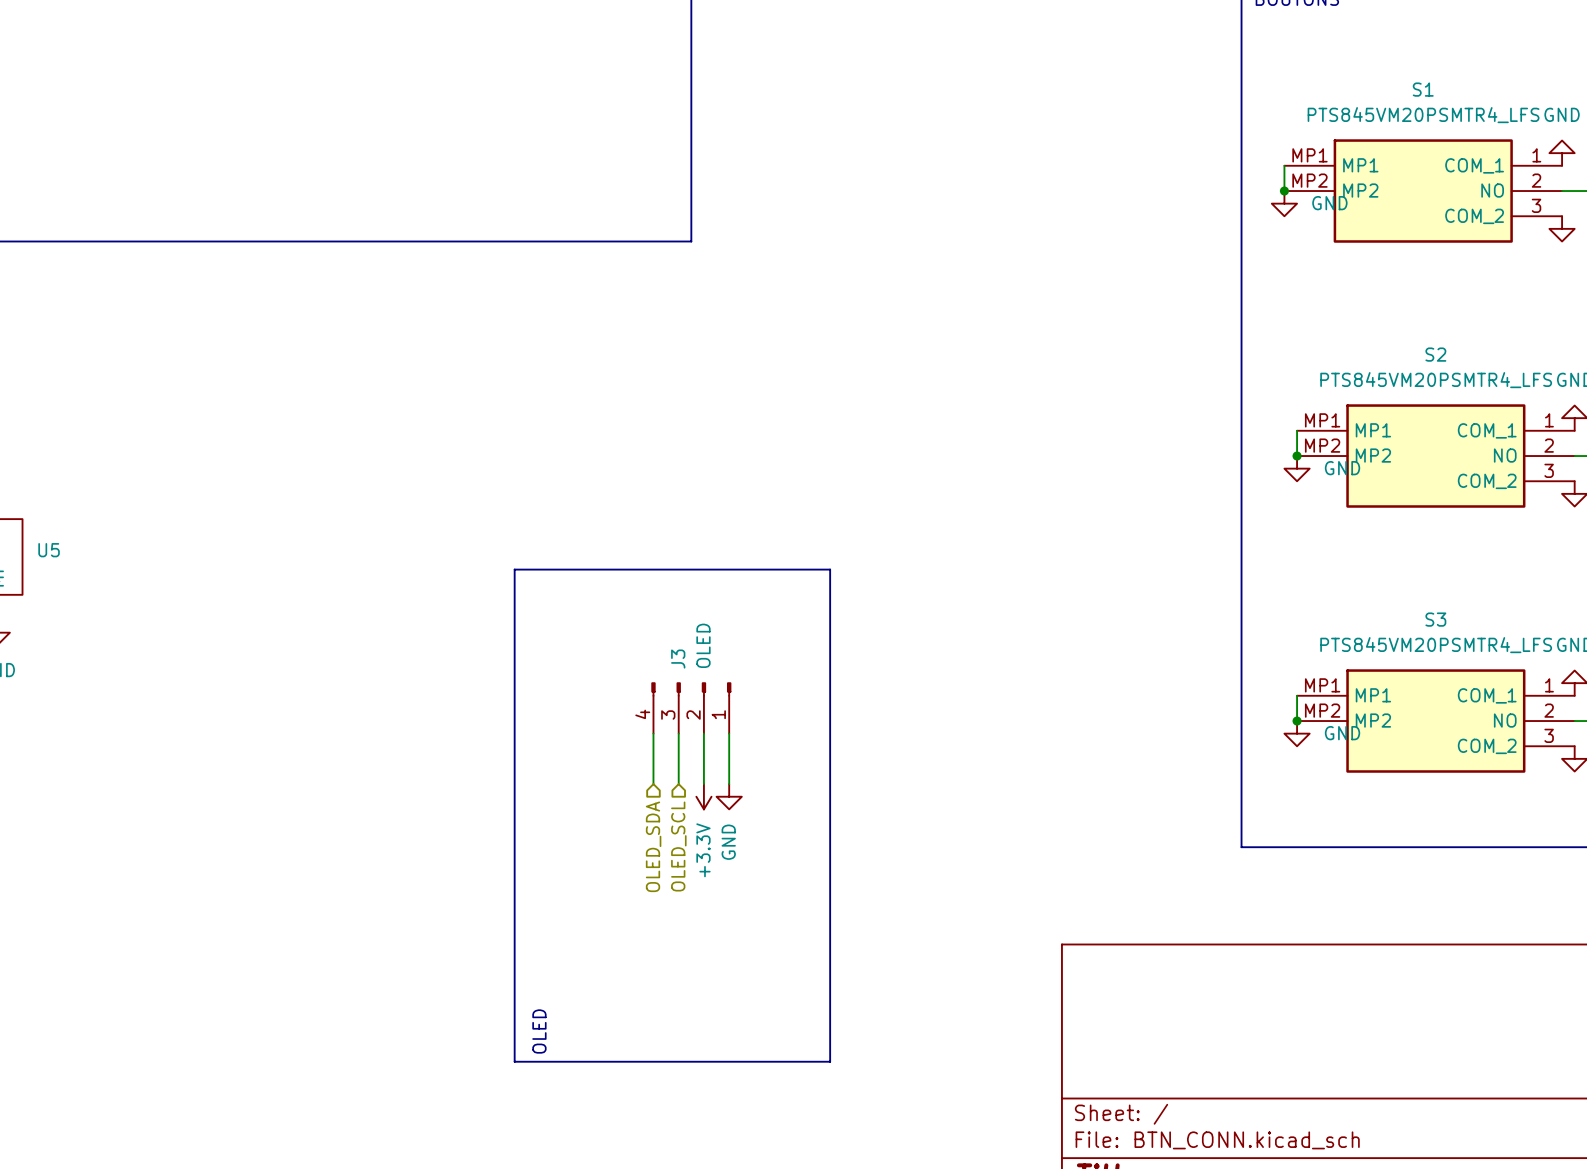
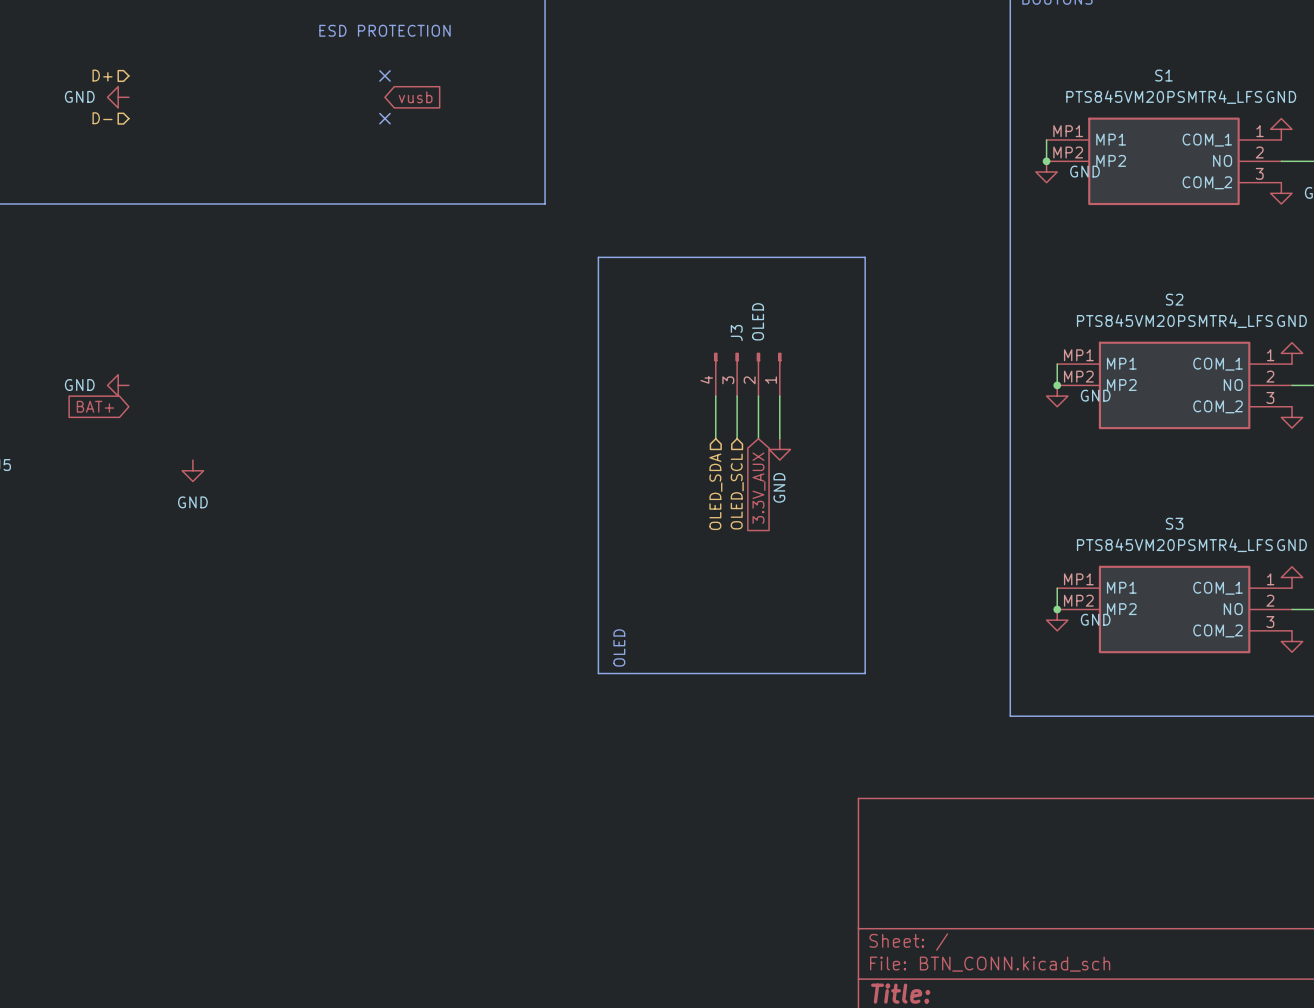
text: none -> ESD PROTECTION (384, 30)
hierarchical label: none -> D+ (102, 75)
no-connect mark: none -> (384, 75)
power symbol: none -> GND (118, 97)
global label: none -> vusb (415, 97)
hierarchical label: none -> D- (102, 118)
no-connect mark: none -> (384, 118)
line: none -> (598, 257) (865, 257) (865, 673) (598, 673) (598, 257)
power symbol: none -> GND (118, 385)
wire: none -> (715, 396) (715, 438)
wire: none -> (737, 396) (737, 438)
wire: none -> (758, 396) (758, 438)
wire: none -> (779, 396) (779, 438)
global label: none -> BAT+ (95, 406)
power symbol: none -> GND (779, 449)
power symbol: none -> GND (192, 470)
line: (514, 569) (830, 569) (830, 1061) (514, 1061) (514, 569) -> none
global label: none -> 3.3V_AUX (758, 488)
hierarchical label: none -> OLED_SDA (715, 491)
hierarchical label: none -> OLED_SCL (737, 491)
J3 position: (691, 708) -> (747, 374)
wire: (653, 733) (653, 784) -> none
wire: (678, 733) (678, 784) -> none
wire: (703, 733) (703, 784) -> none
wire: (729, 733) (729, 784) -> none
text: none -> OLED (619, 647)
power symbol: +3.3V (703, 796) -> none
power symbol: GND (729, 796) -> none
hierarchical label: OLED_SDA (653, 846) -> none
hierarchical label: OLED_SCL (678, 846) -> none
text: OLED (539, 1031) -> none

